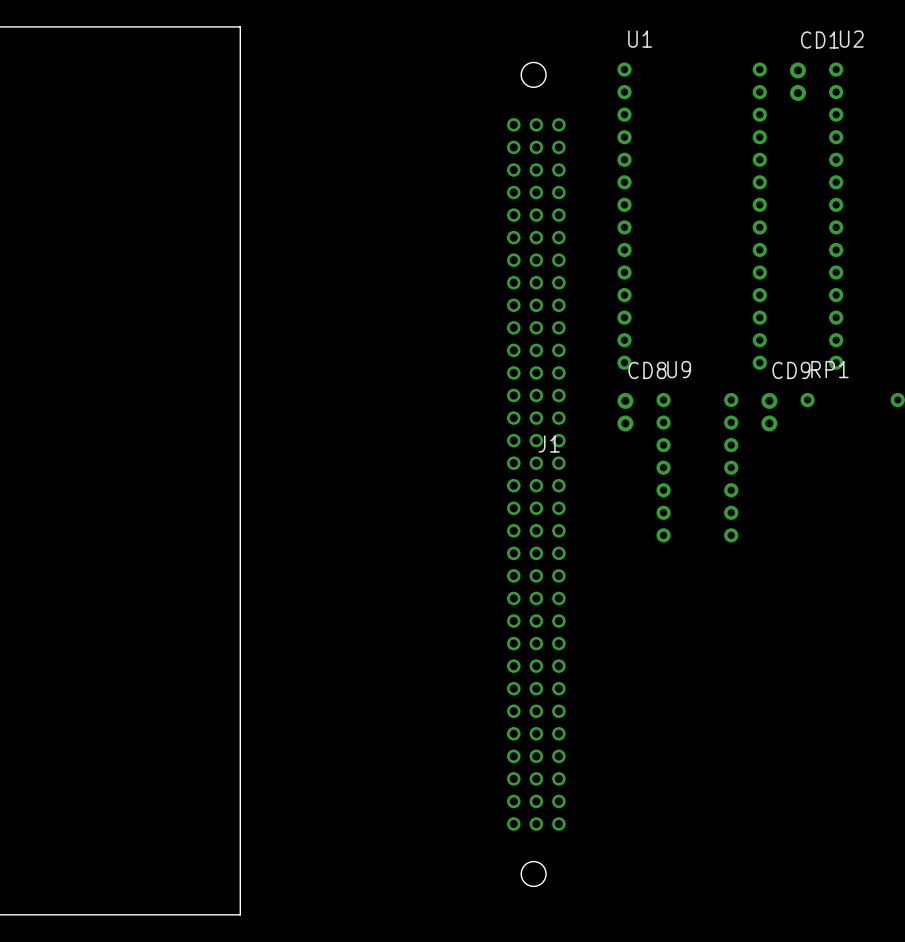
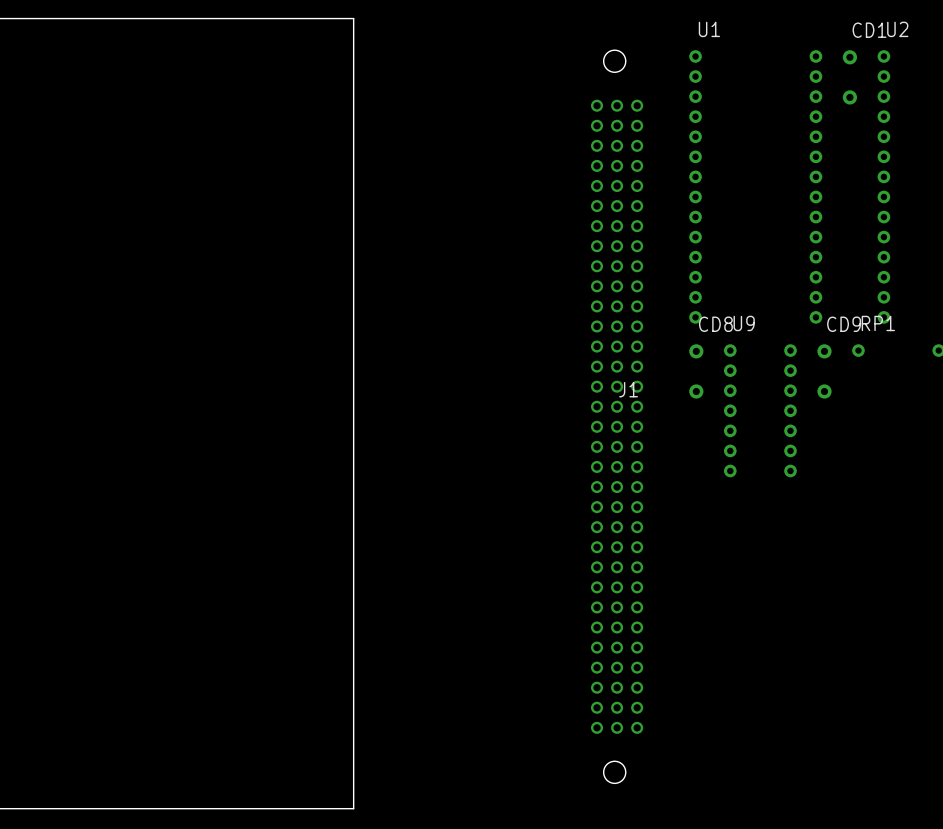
CD1 footprint: [789, 62, 806, 101] -> [842, 50, 858, 105]
CD8 footprint: [617, 392, 634, 432] -> [689, 344, 704, 399]
CD9 footprint: [761, 392, 778, 432] -> [817, 344, 832, 399]

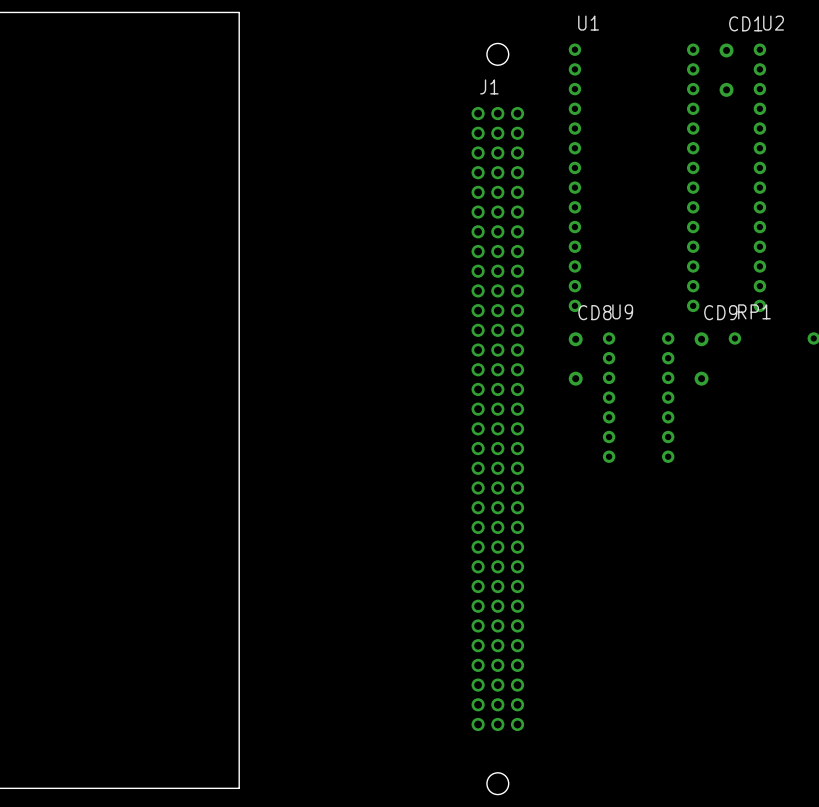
J1 footprint: [590, 50, 644, 784] -> [471, 43, 525, 795]
J1 name position: J1 (628, 389) -> J1 (489, 86)

